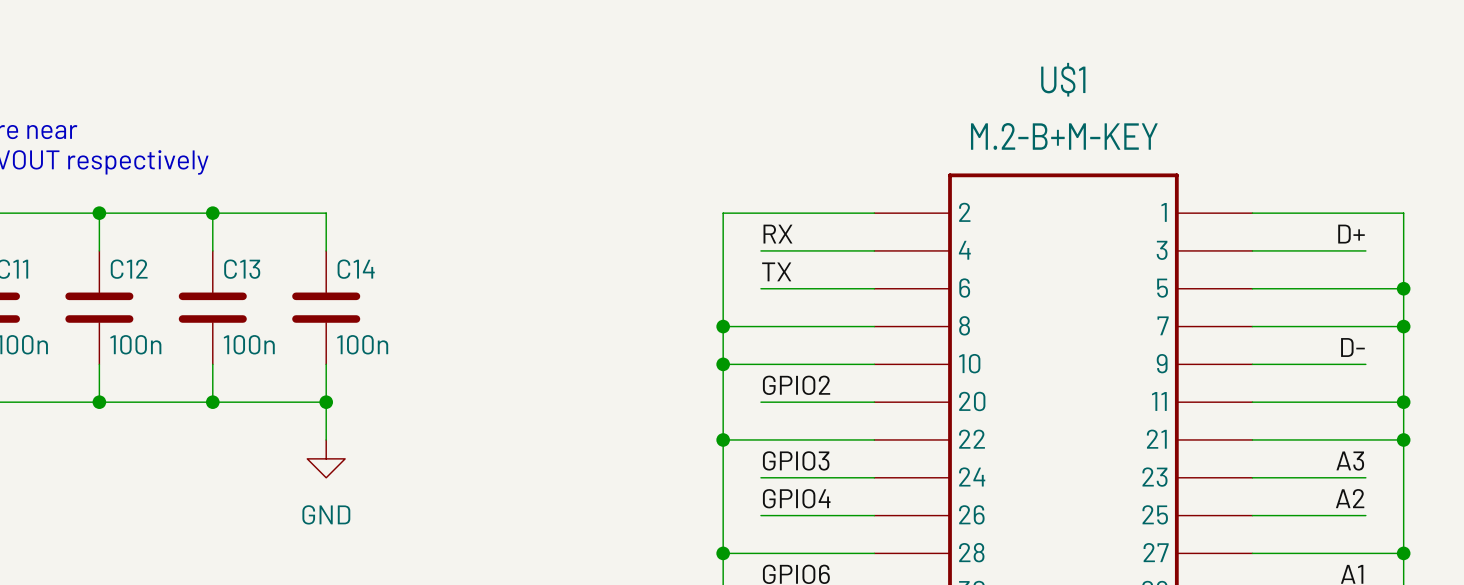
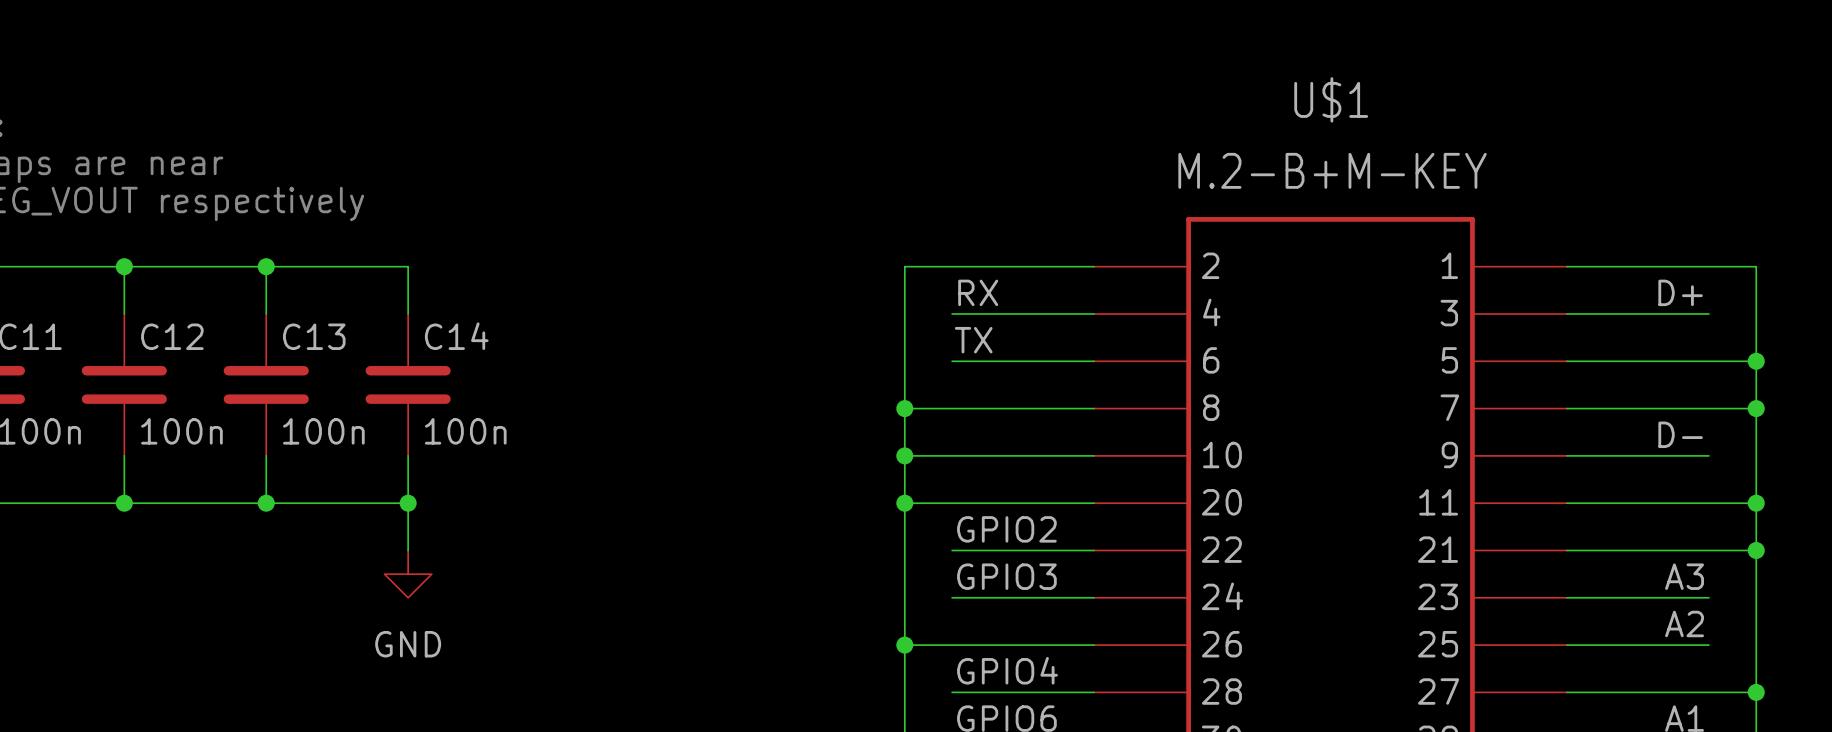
label position: GPIO2 (796, 385) -> GPIO2 (1006, 529)
junction: none -> (904, 503)
wire: (723, 439) (760, 439) -> (904, 503) (952, 503)
junction: (723, 439) -> none
label position: GPIO4 (796, 498) -> GPIO4 (1007, 670)
junction: none -> (904, 645)
wire: (723, 553) (760, 553) -> (904, 645) (952, 645)
junction: (723, 553) -> none

